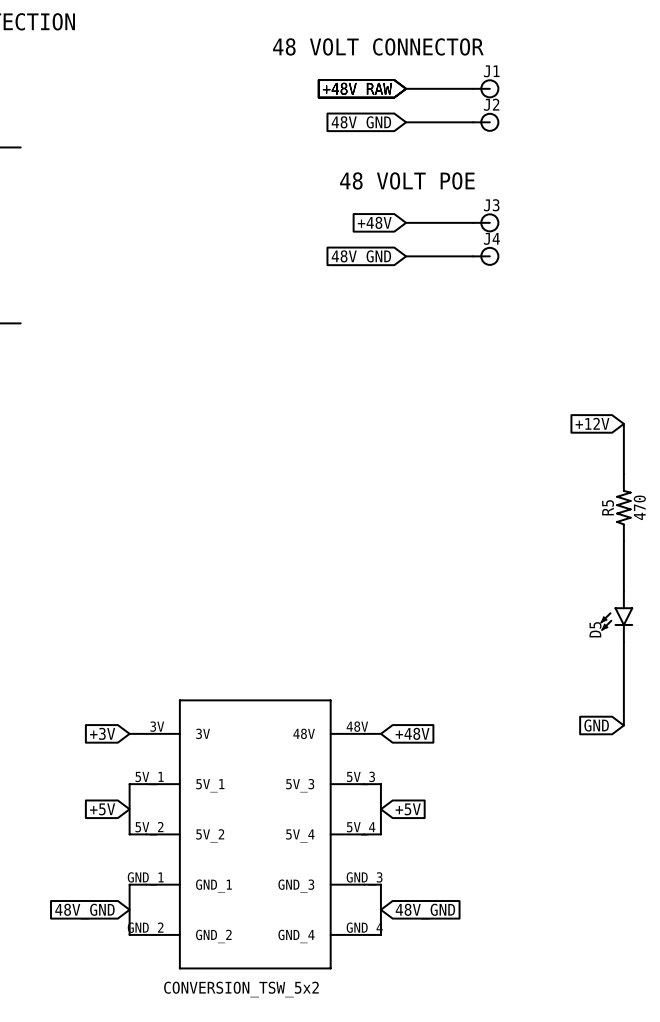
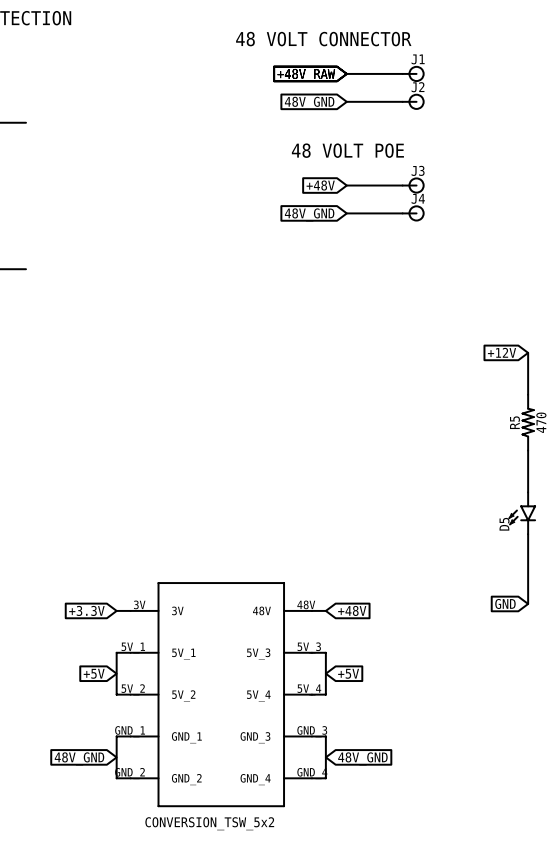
global label: +3V (102, 733) -> +3.3V (86, 610)

